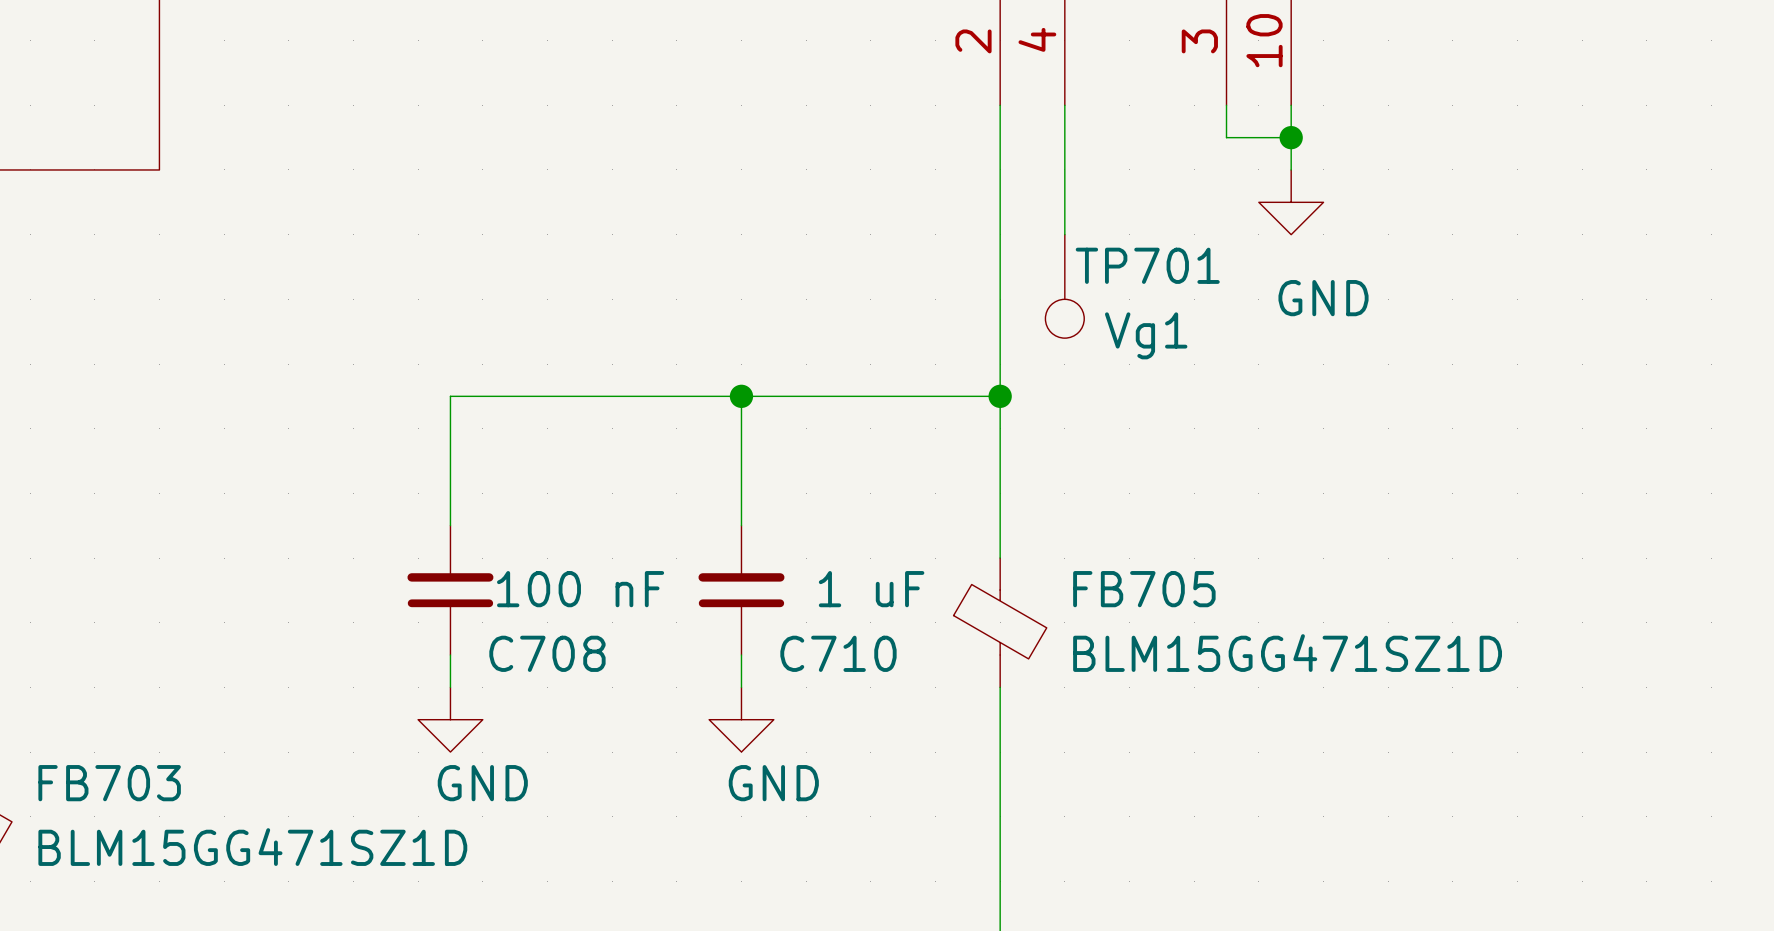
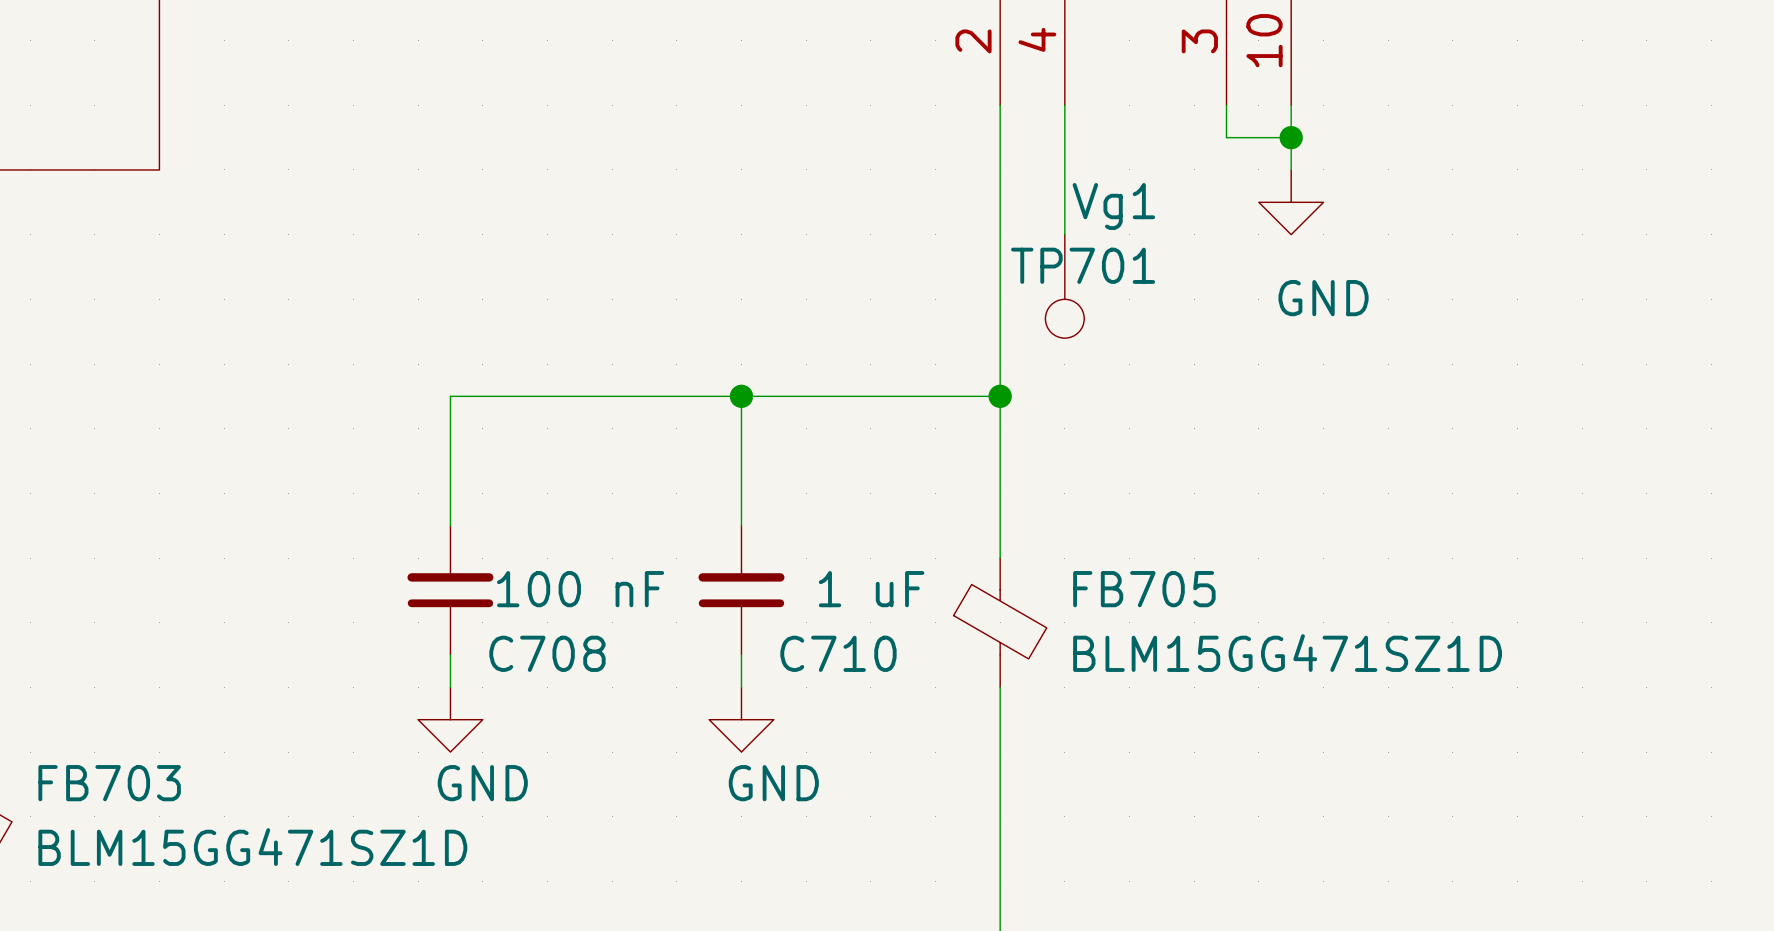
TP701 name position: TP701 (1147, 265) -> TP701 (1083, 265)
TP701 value position: Vg1 (1146, 335) -> Vg1 (1113, 206)

